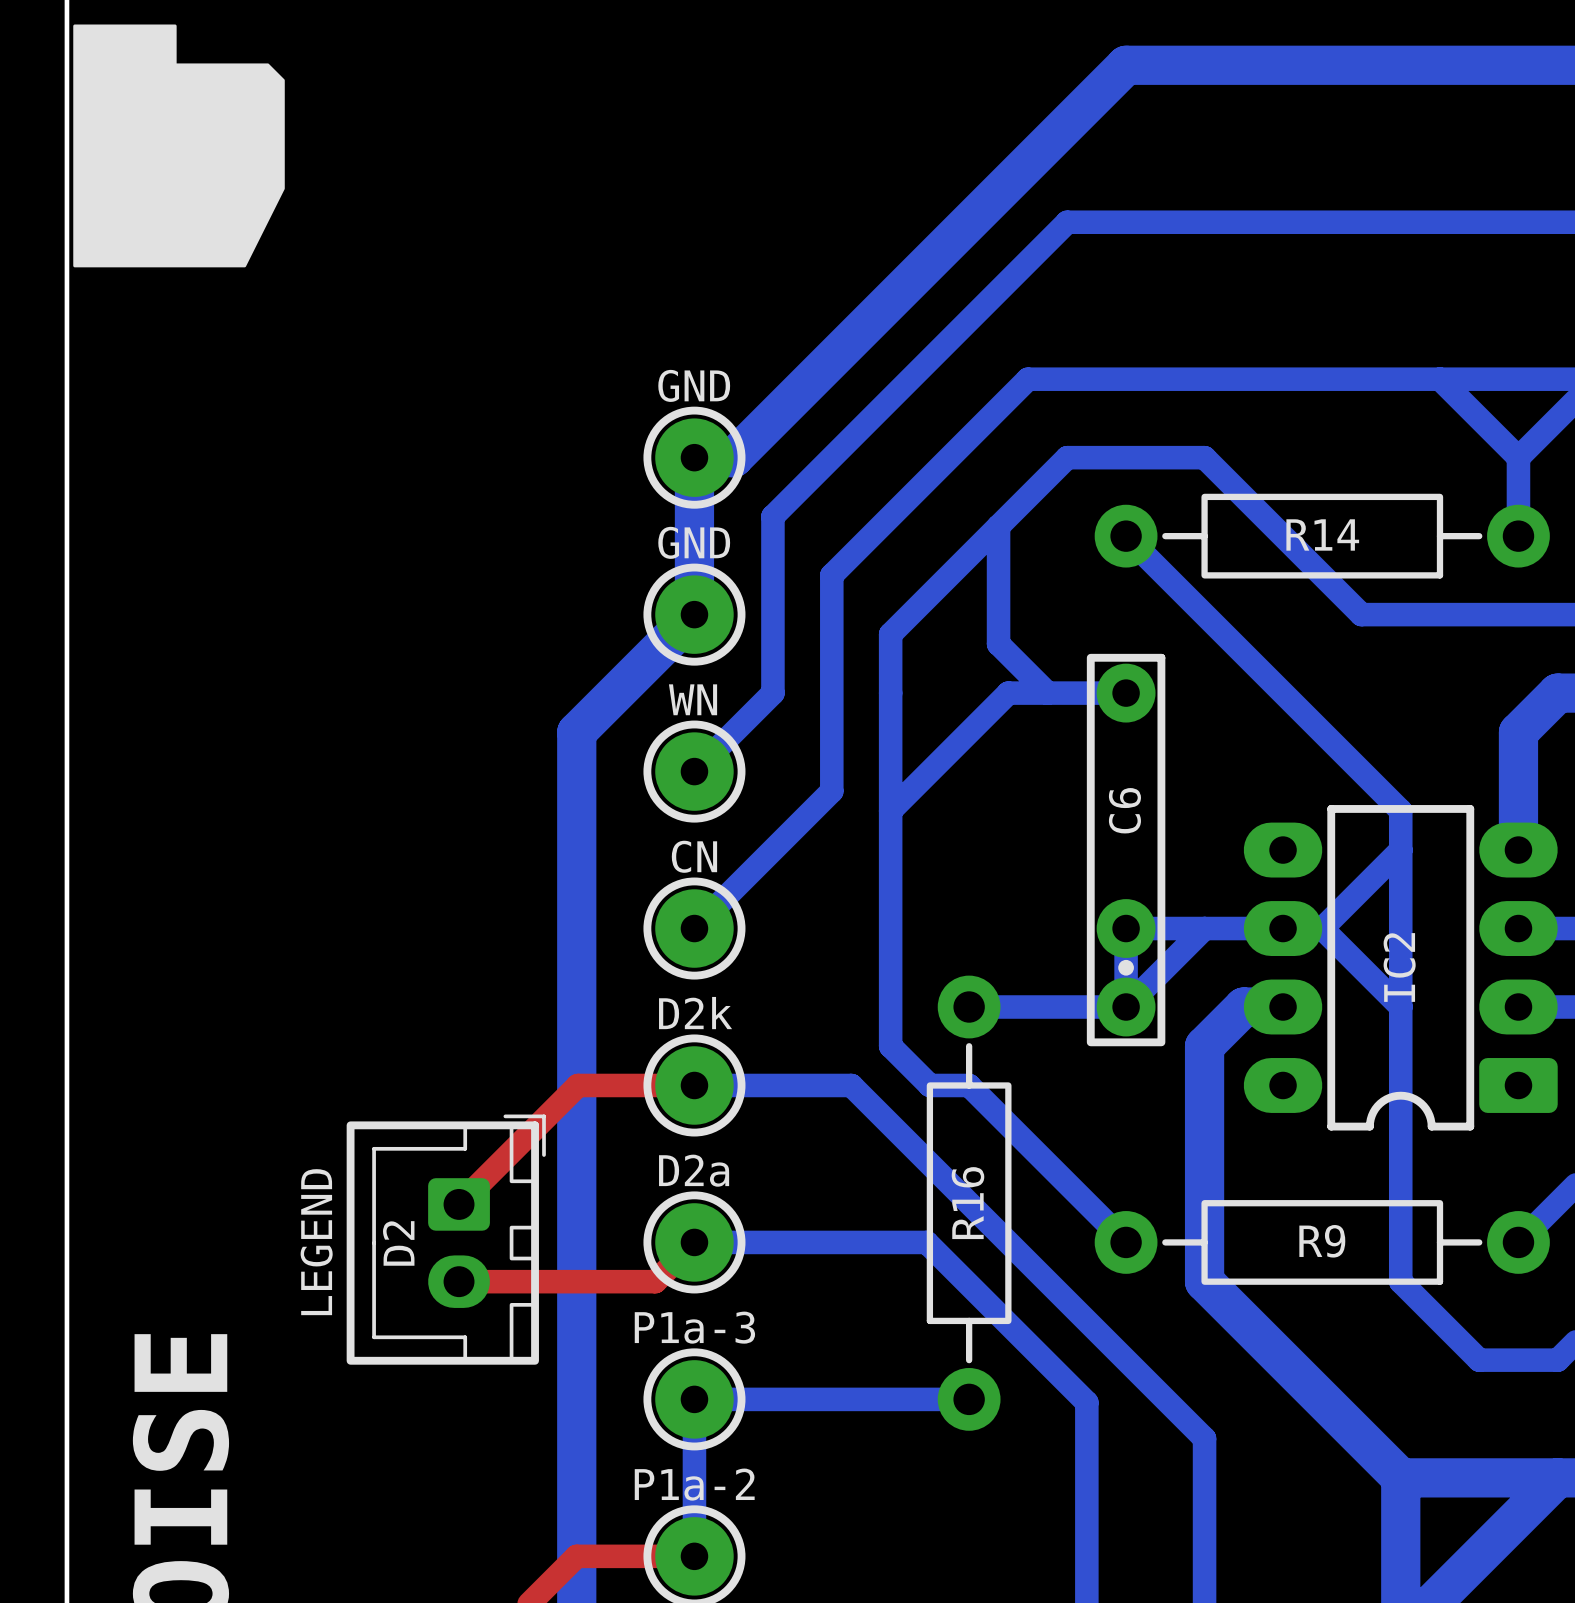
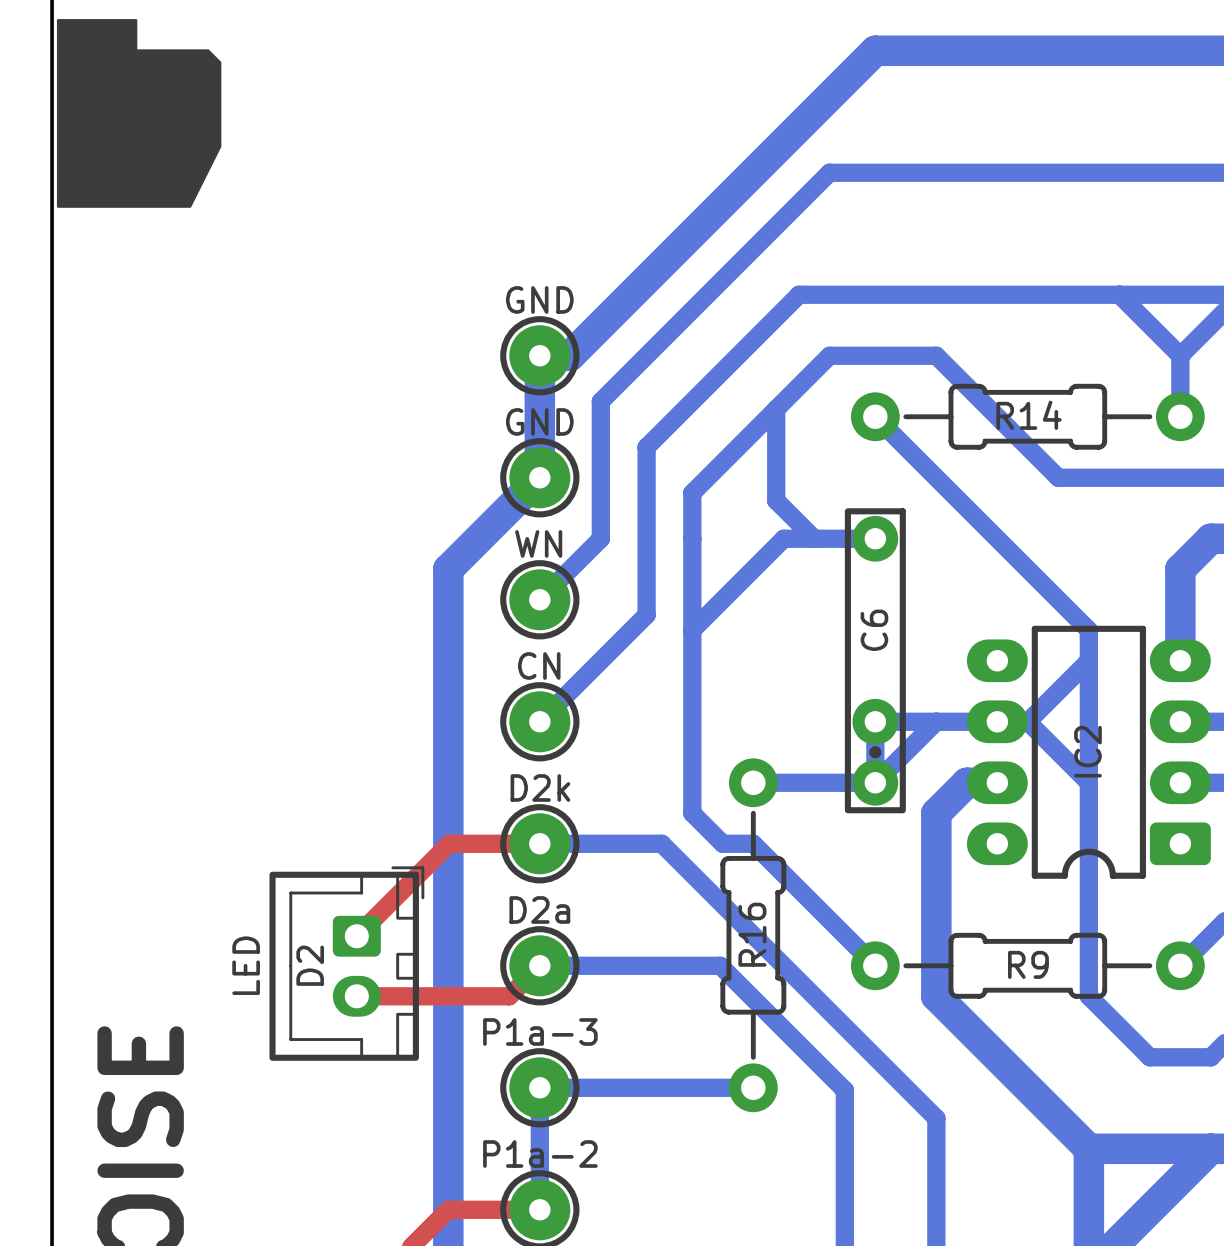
R14 footprint: [1094, 493, 1550, 579] -> [850, 383, 1205, 450]
R16 footprint: [926, 975, 1012, 1431] -> [720, 758, 787, 1113]
R9 footprint: [1094, 1200, 1550, 1285] -> [850, 932, 1205, 999]
D2 text: LEGEND (316, 1242) -> LED (246, 965)

